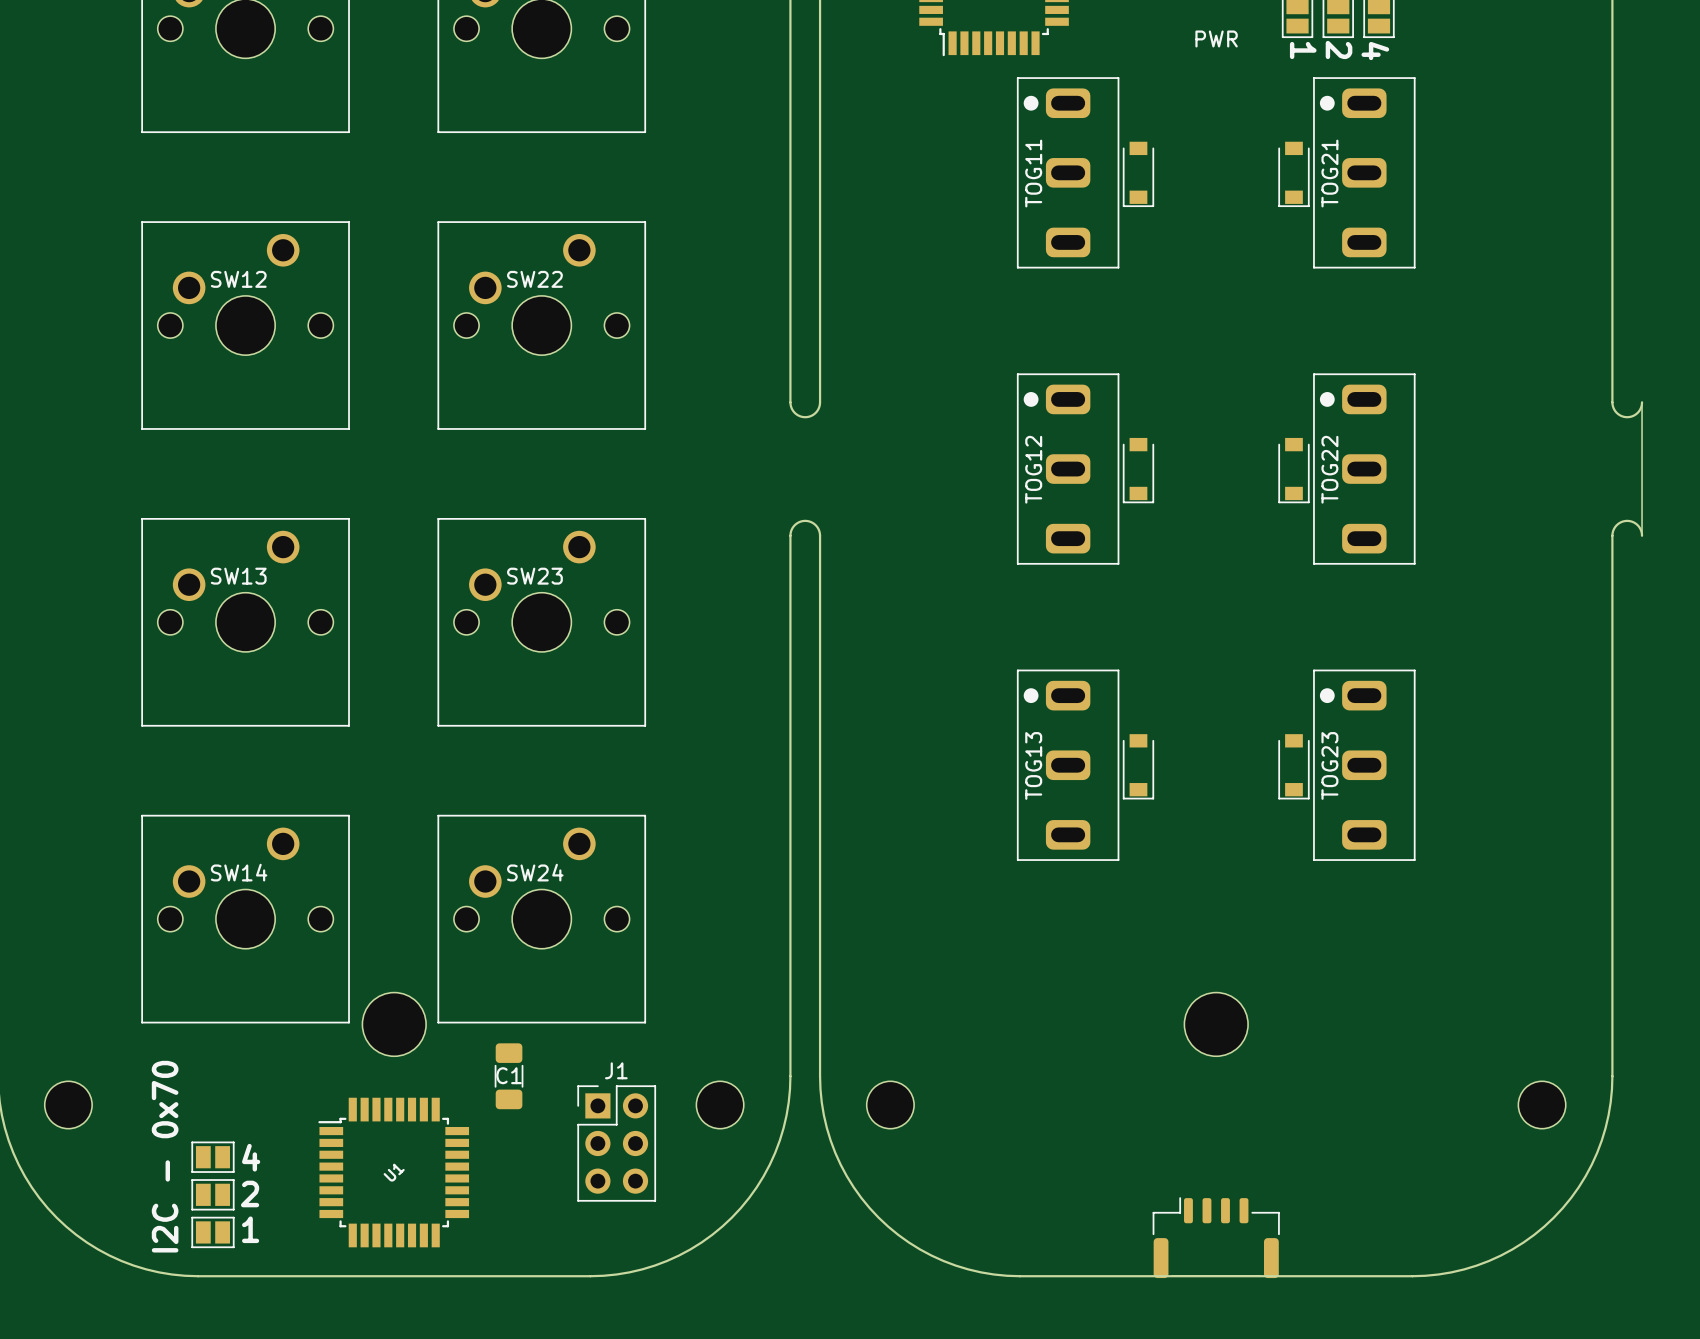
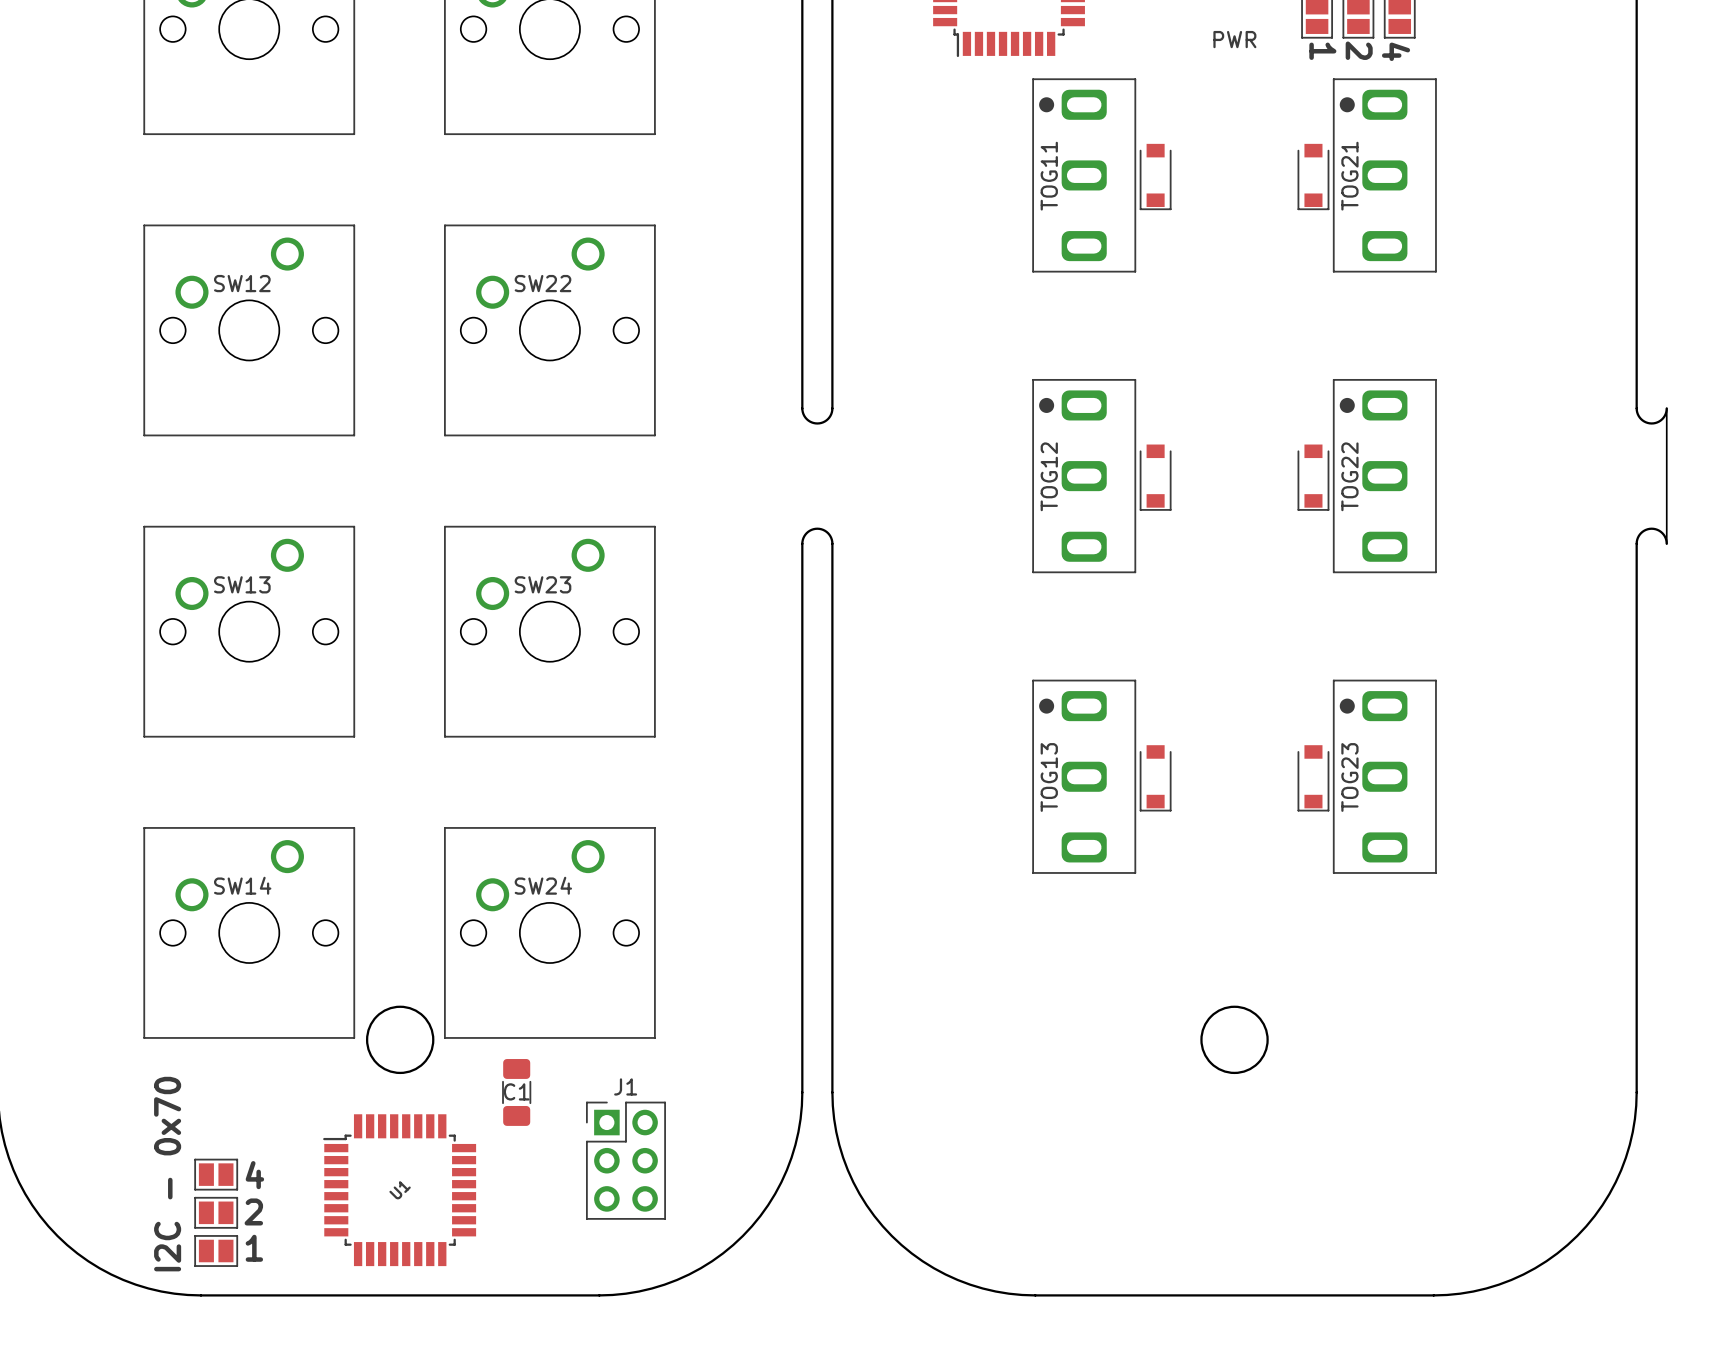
round board edge: none -> [365, 1005, 435, 1075]
round board edge: none -> [1200, 1005, 1269, 1075]
part: (394, 1024) -> none
part: (1216, 1024) -> none
part: (68, 1105) -> none
part: (720, 1105) -> none
part: (890, 1105) -> none
part: (1542, 1105) -> none
part: (1216, 1237) -> none

